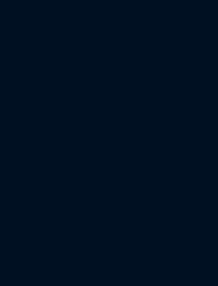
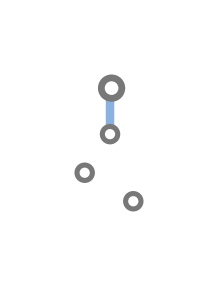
track: none -> (111, 88) (110, 134)
via: none -> (111, 88)
via: none -> (110, 134)
via: none -> (84, 172)
via: none -> (133, 201)

